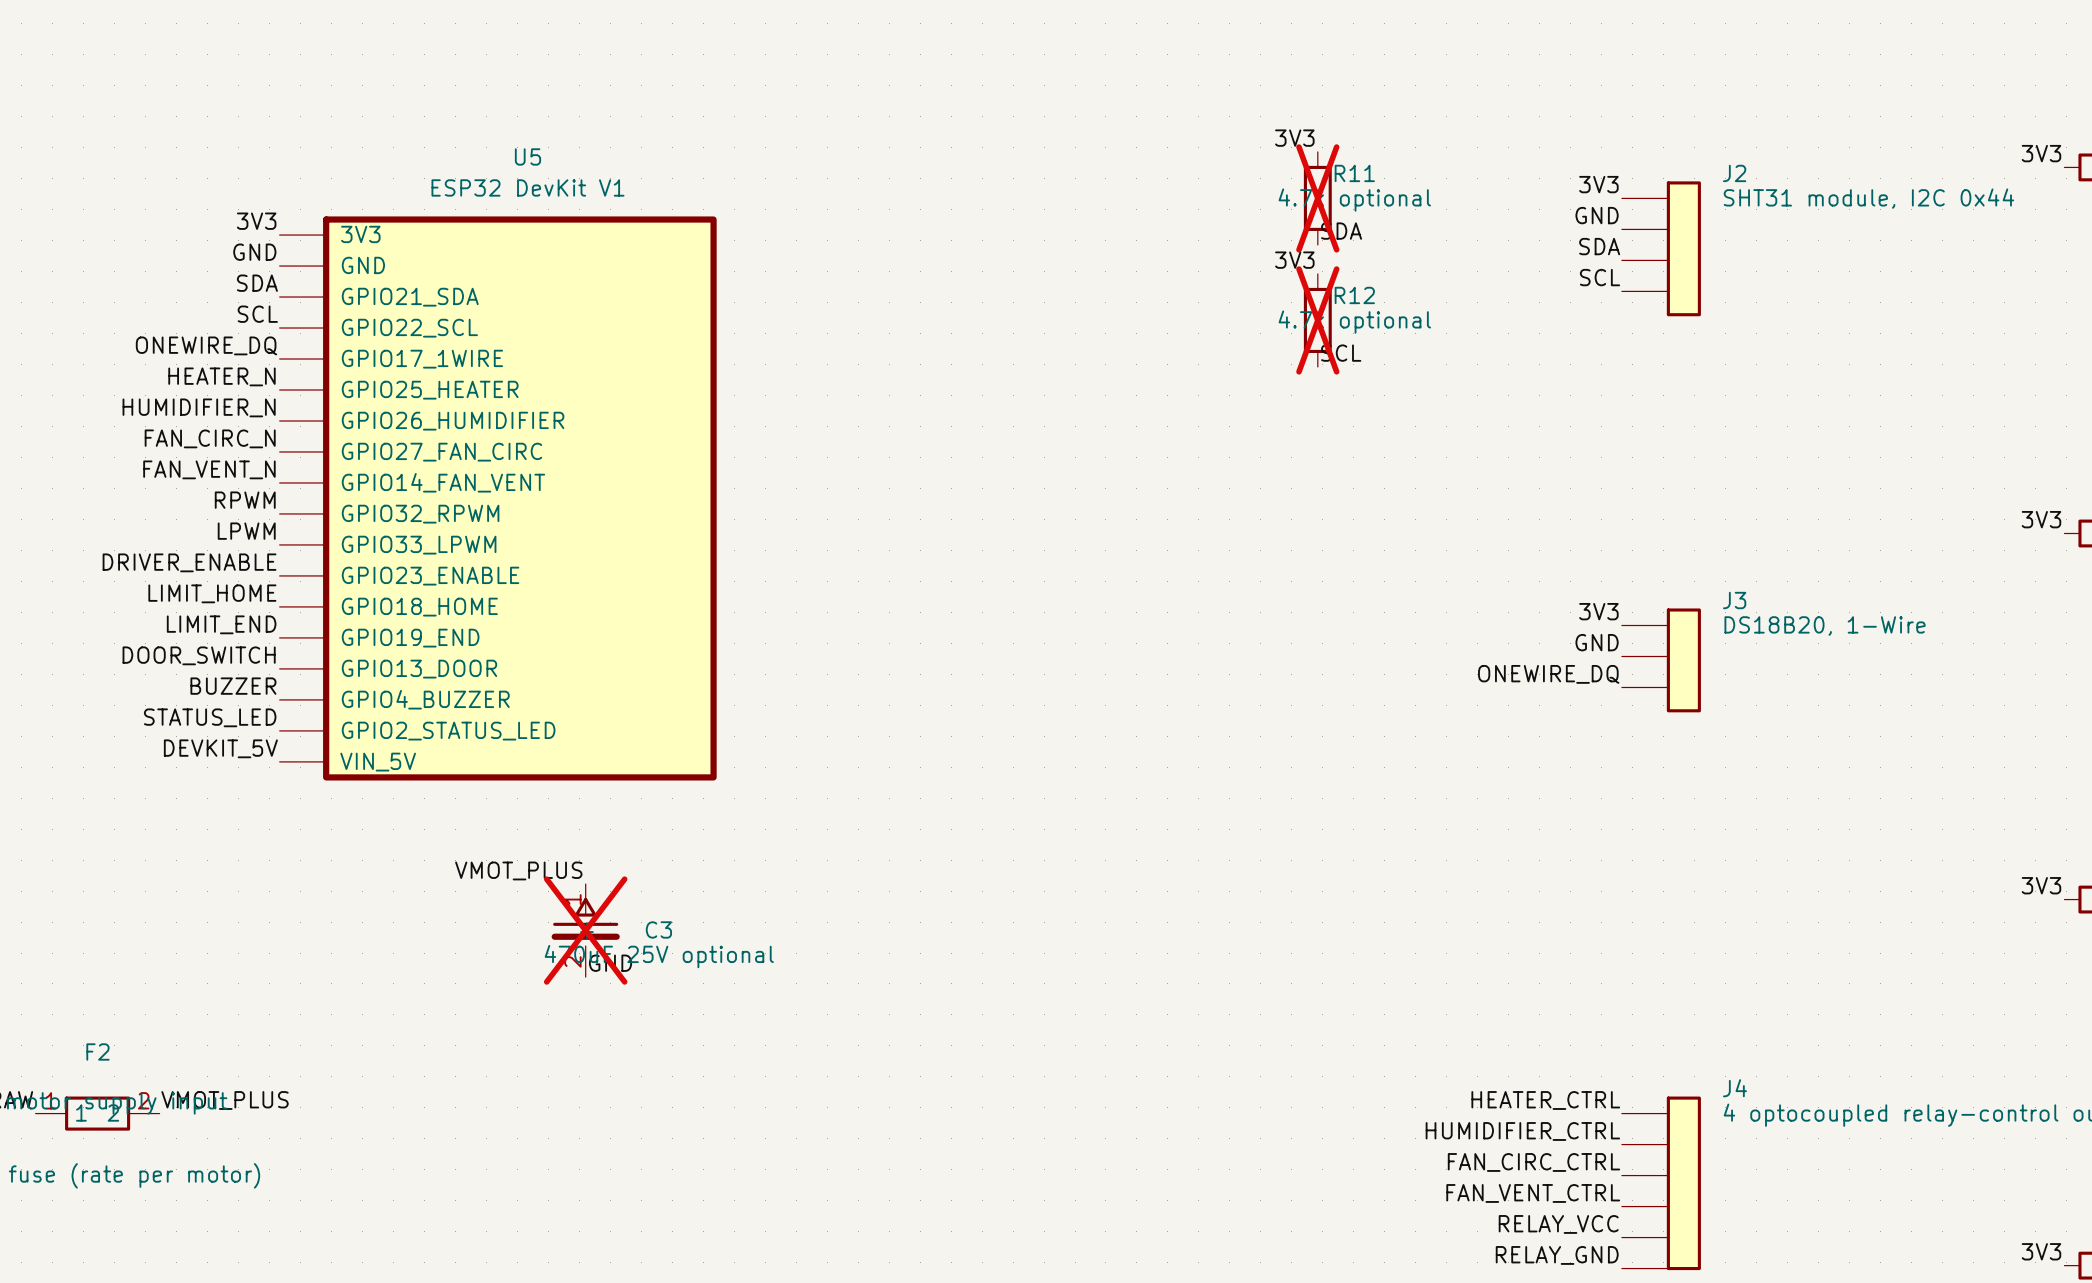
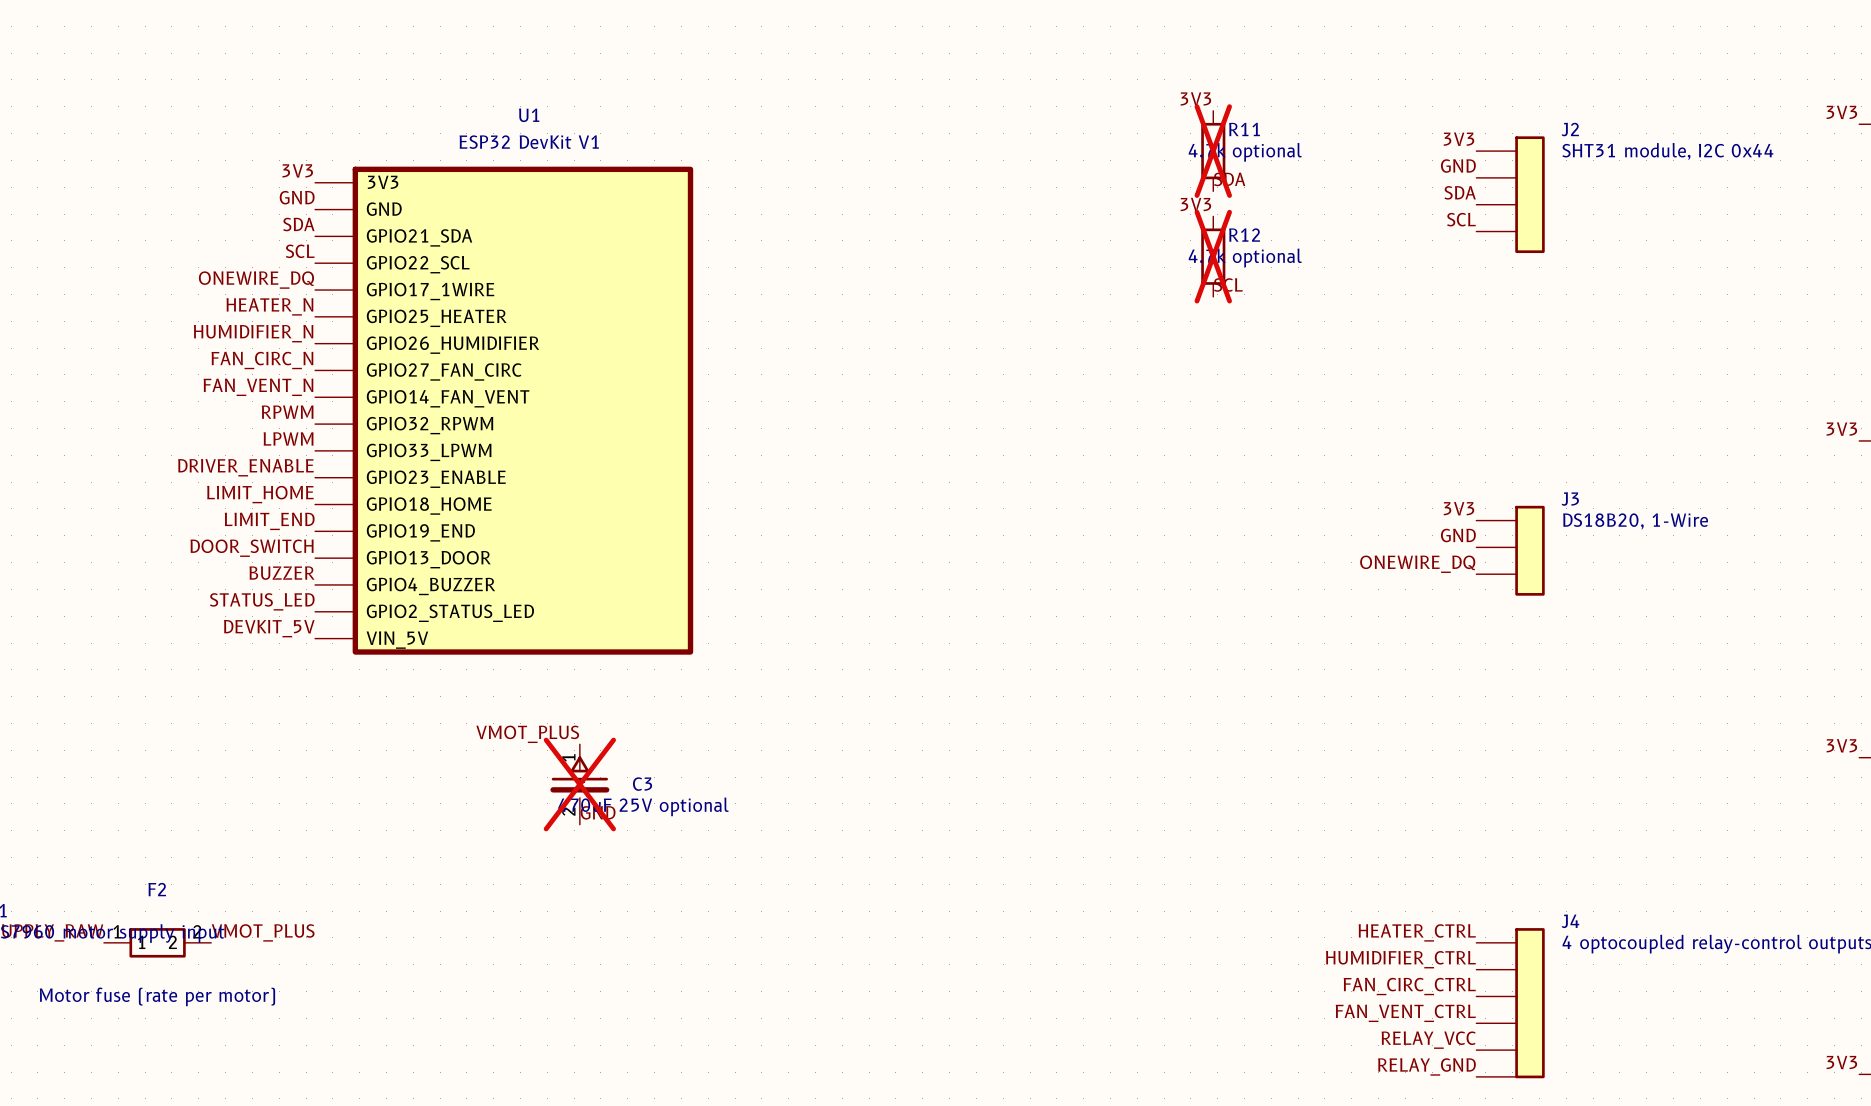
U5 name: U5 (527, 156) -> U1 (529, 115)

